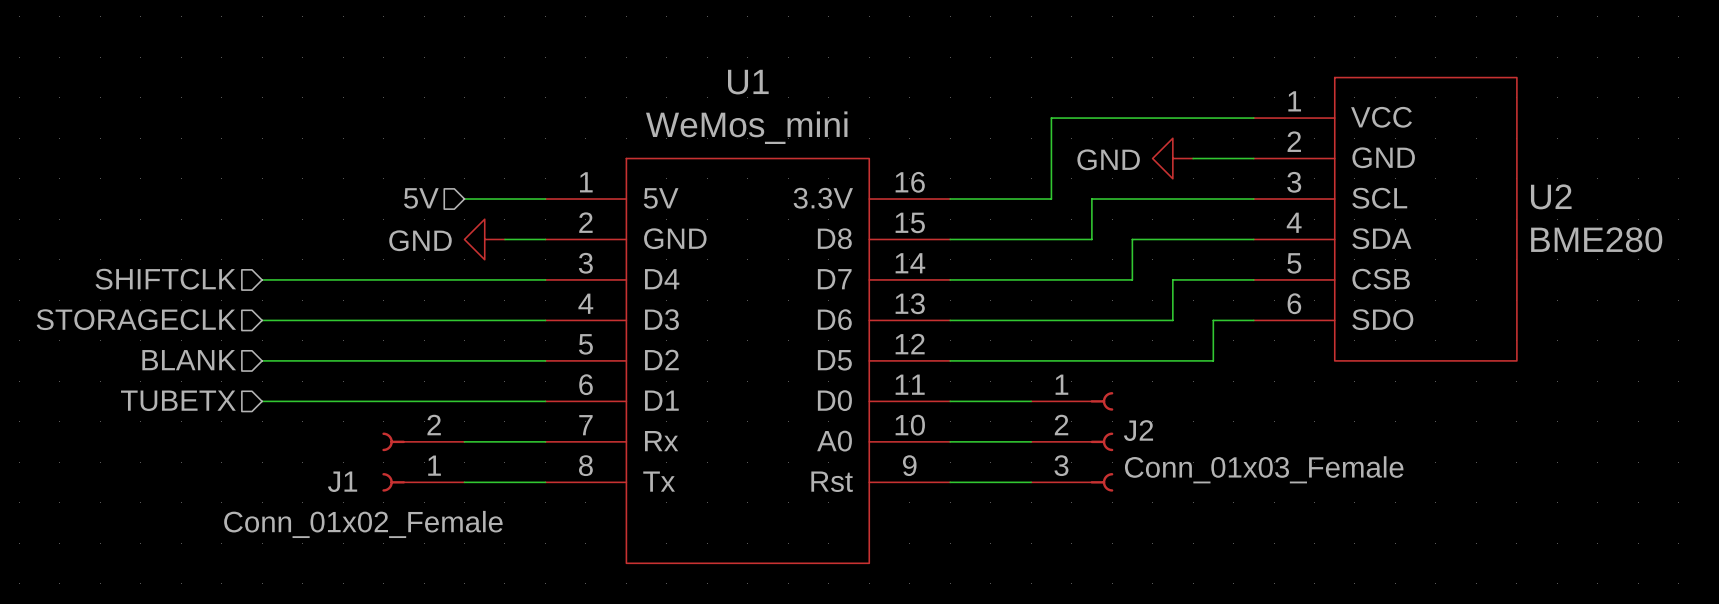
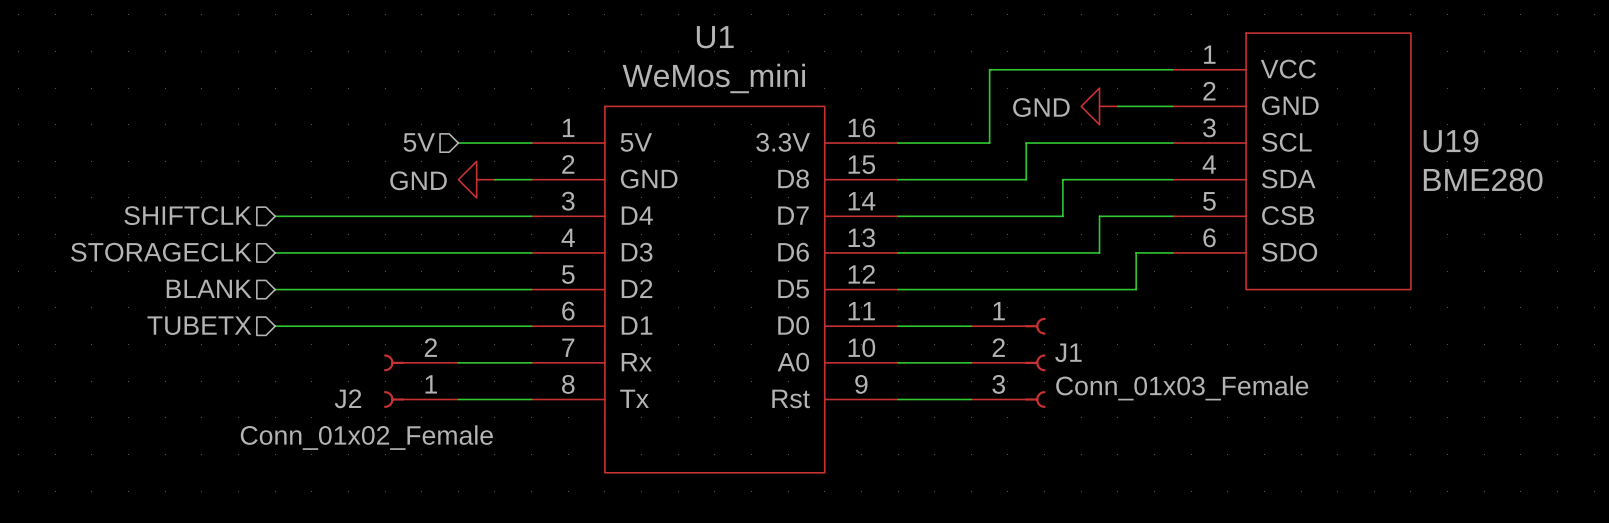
U2 name: U2 (1551, 196) -> U19 (1451, 141)
J2 name: J2 (1138, 430) -> J1 (1068, 352)
J1 name: J1 (342, 481) -> J2 (347, 398)

